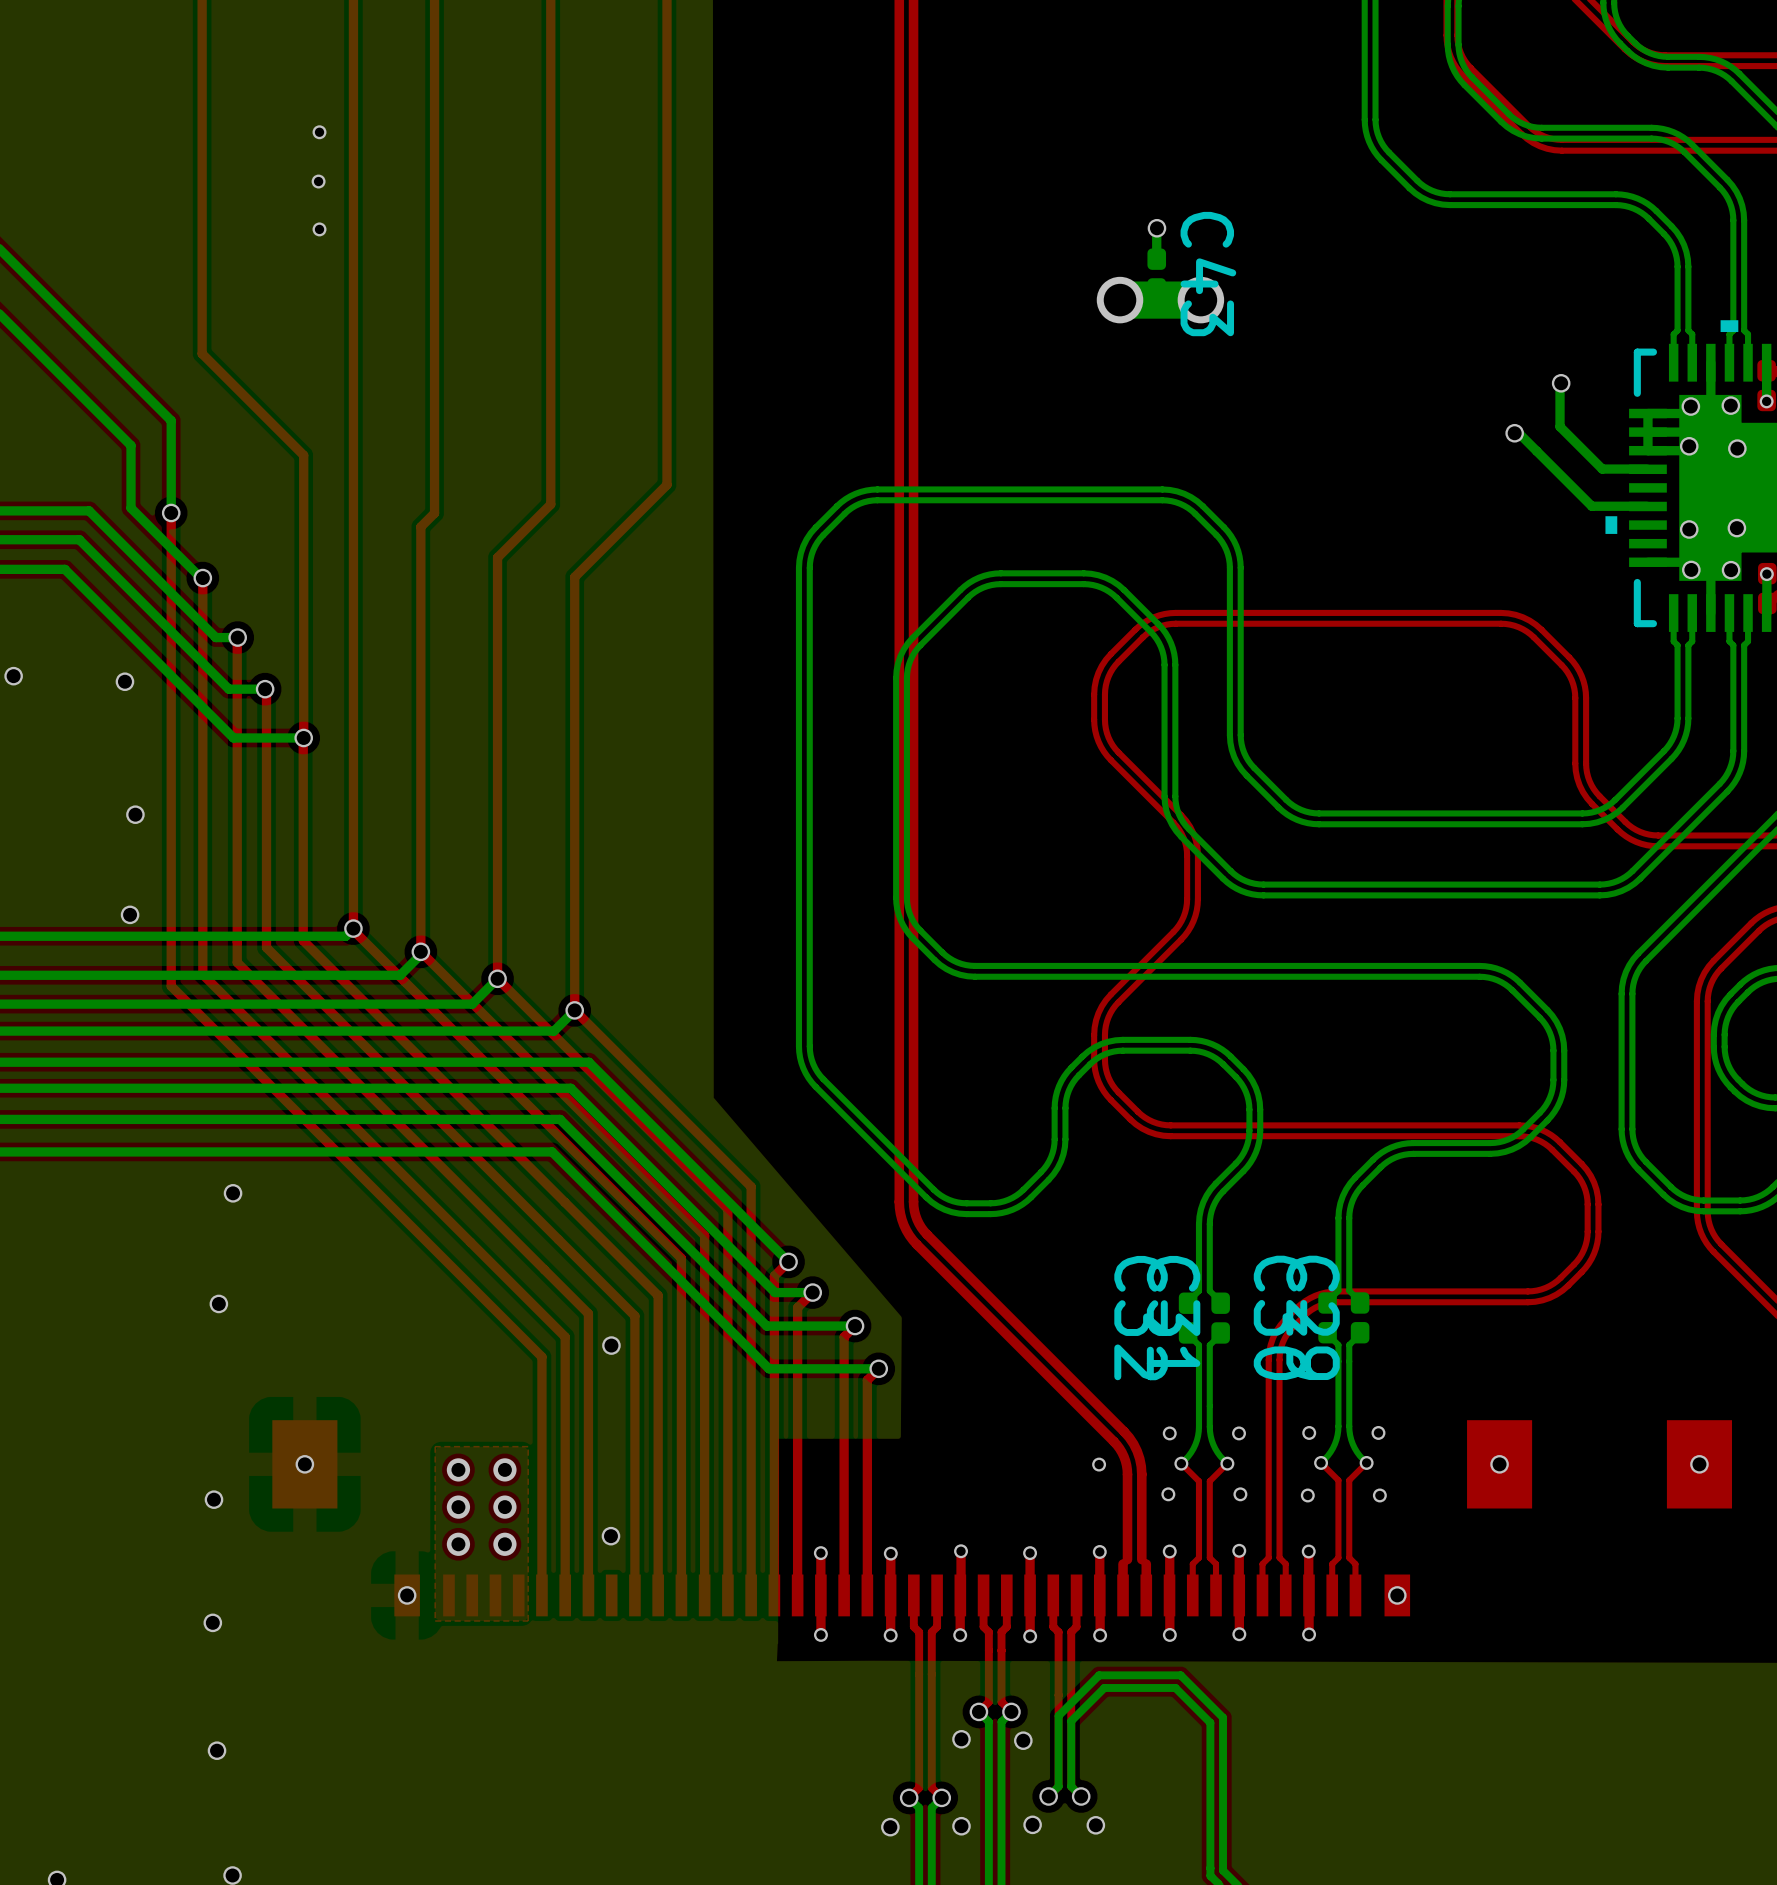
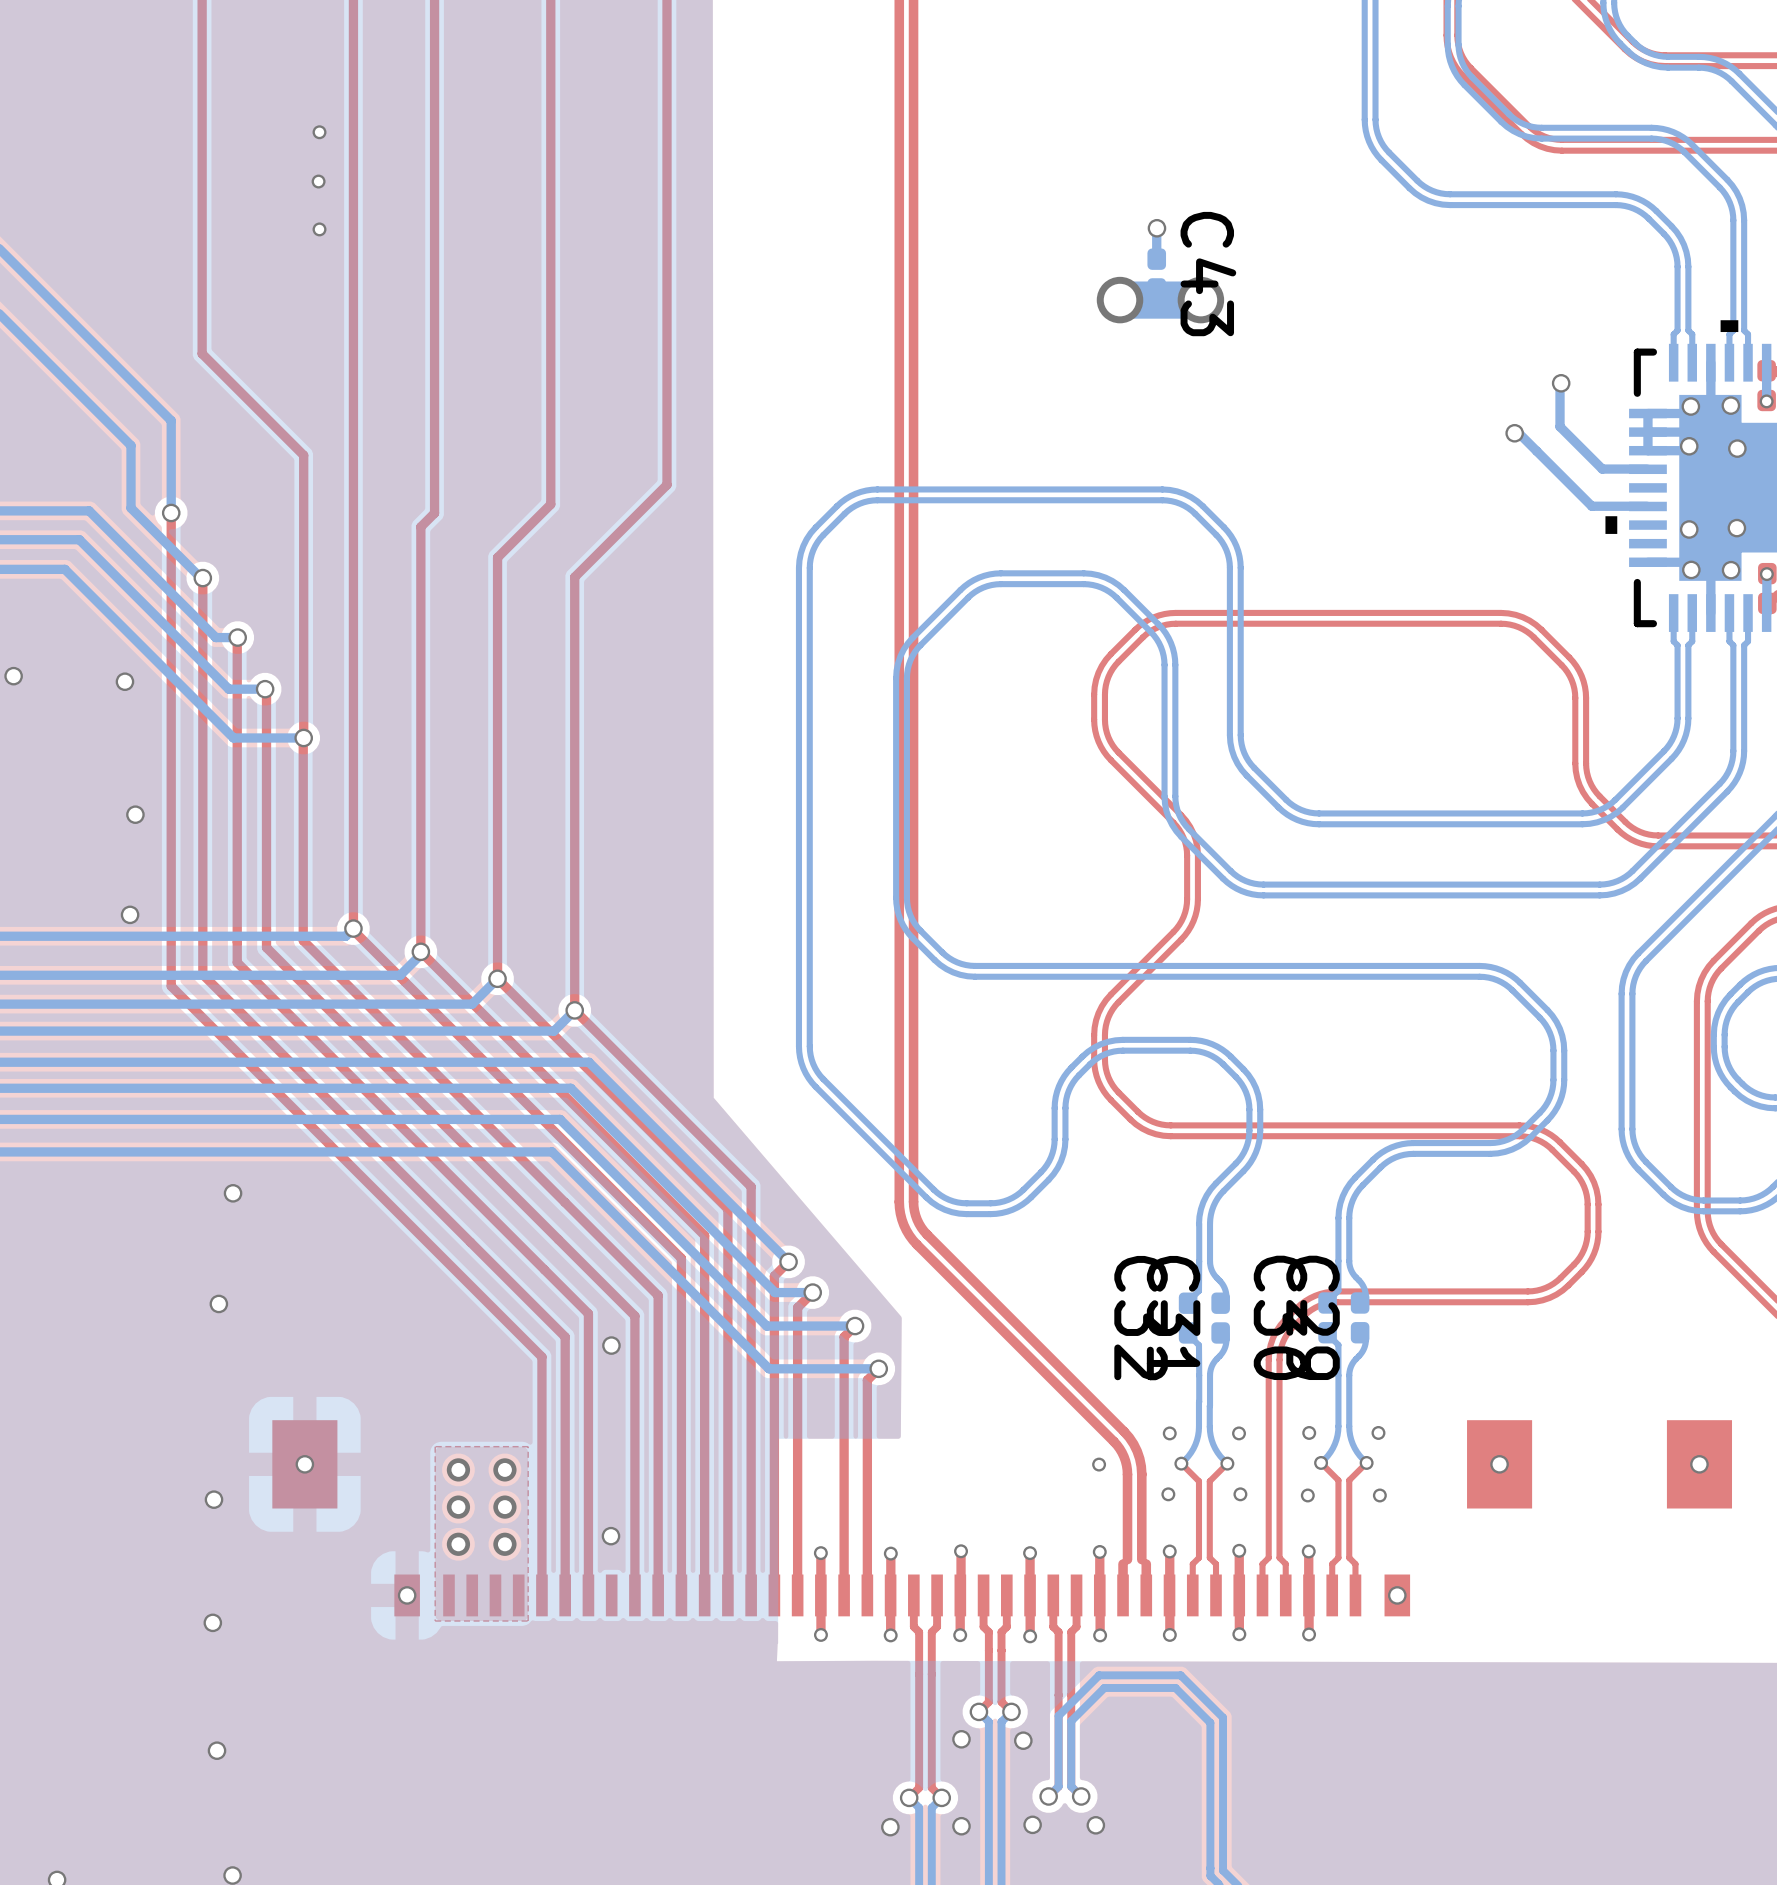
bottom track: (1223, 1191) (1213, 1206) (1209, 1224) (1209, 1290) (1220, 1303) -> (1223, 1191) (1215, 1201) (1210, 1214) (1210, 1261) (1213, 1273) (1224, 1288) (1226, 1303)
bottom track: (1349, 1261) (1349, 1290) (1360, 1302) -> (1349, 1261) (1352, 1272) (1364, 1288) (1365, 1303)
bottom track: (1220, 1332) (1209, 1345) (1209, 1406) -> (1226, 1333) (1224, 1348) (1210, 1369) (1210, 1405)
bottom track: (1360, 1332) (1349, 1345) (1349, 1375) -> (1365, 1333) (1364, 1348) (1352, 1363) (1349, 1375)

